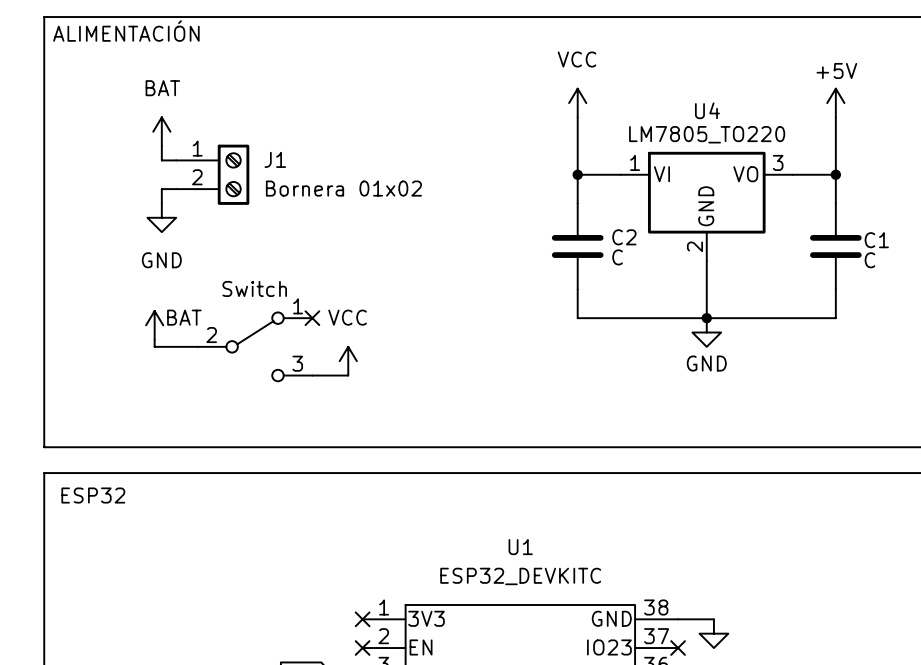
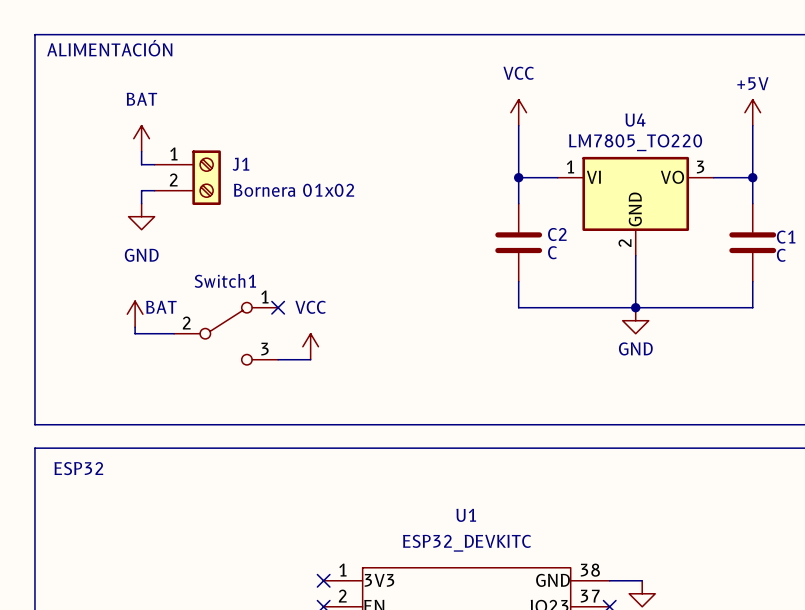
Switch name: Switch (254, 288) -> Switch1 (225, 280)

